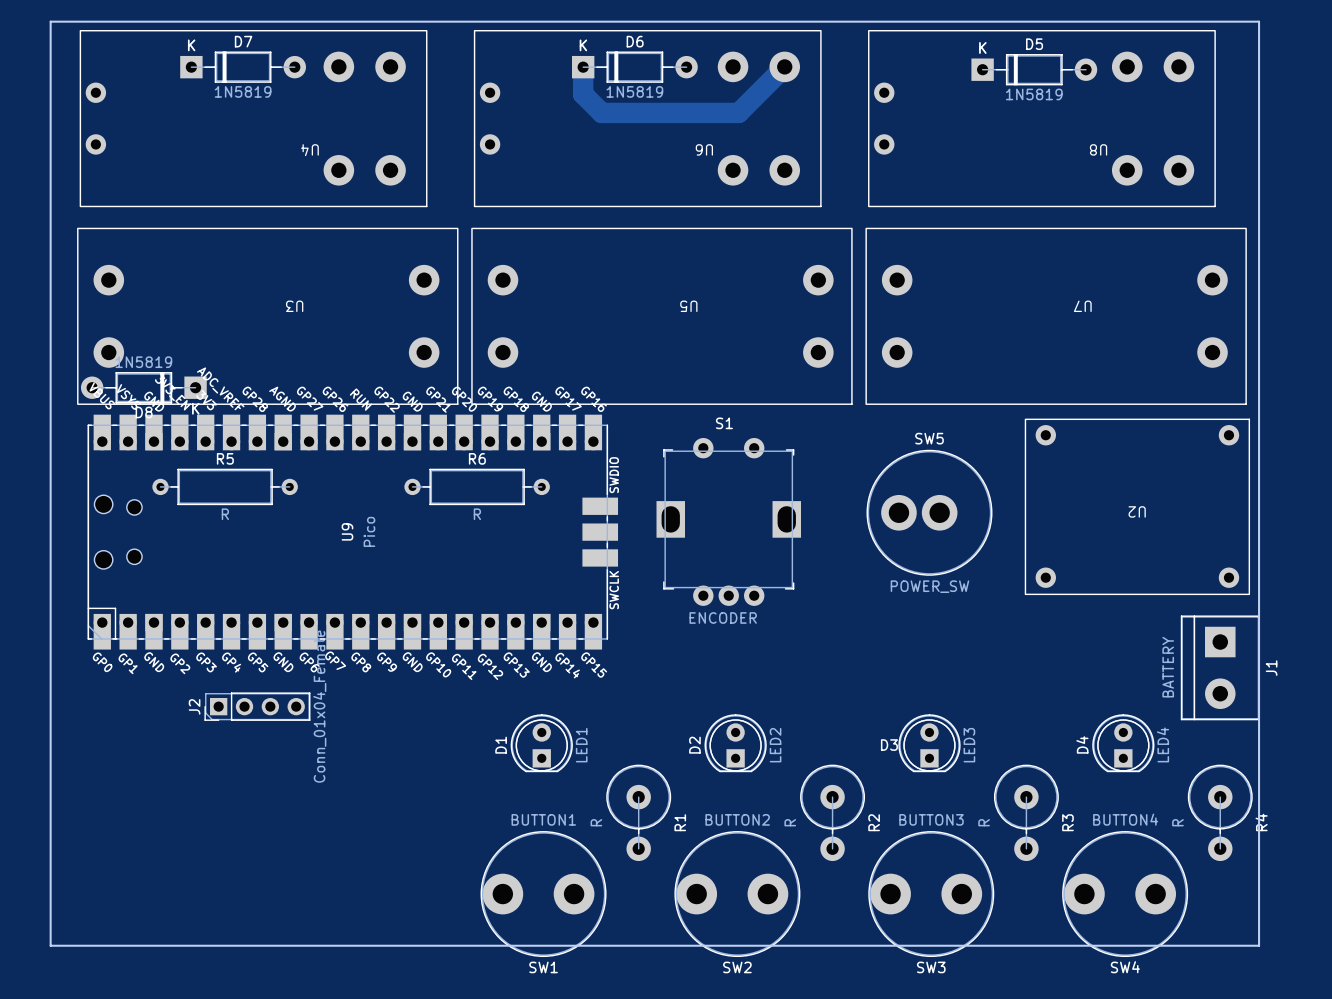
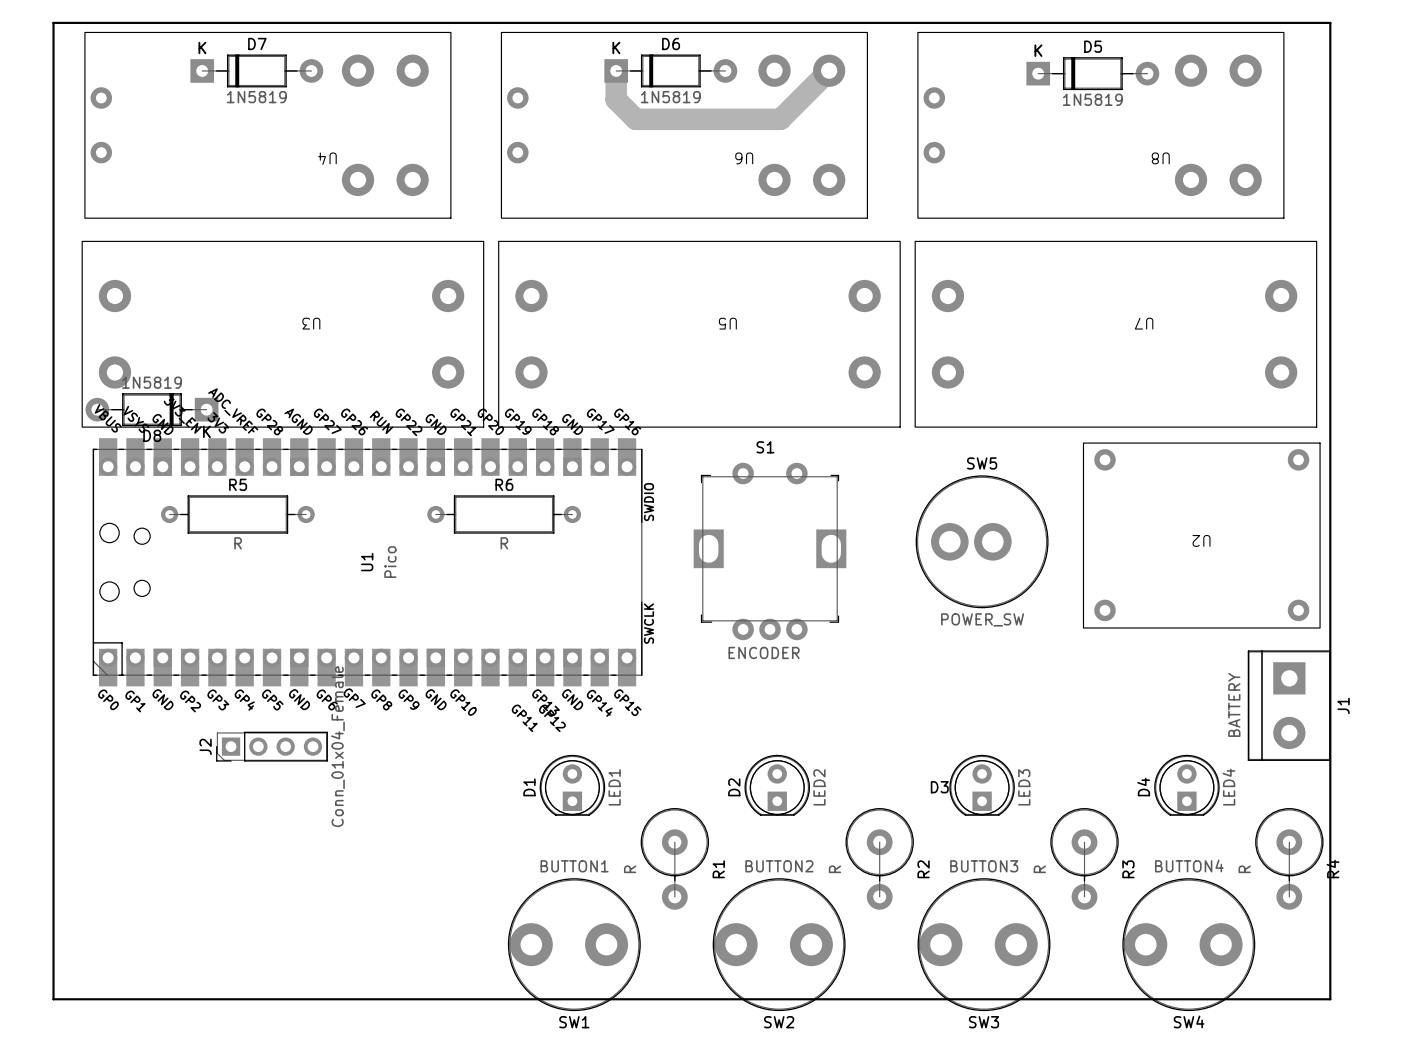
U1: none -> Pico (367, 562)
U9: Pico (352, 532) -> none

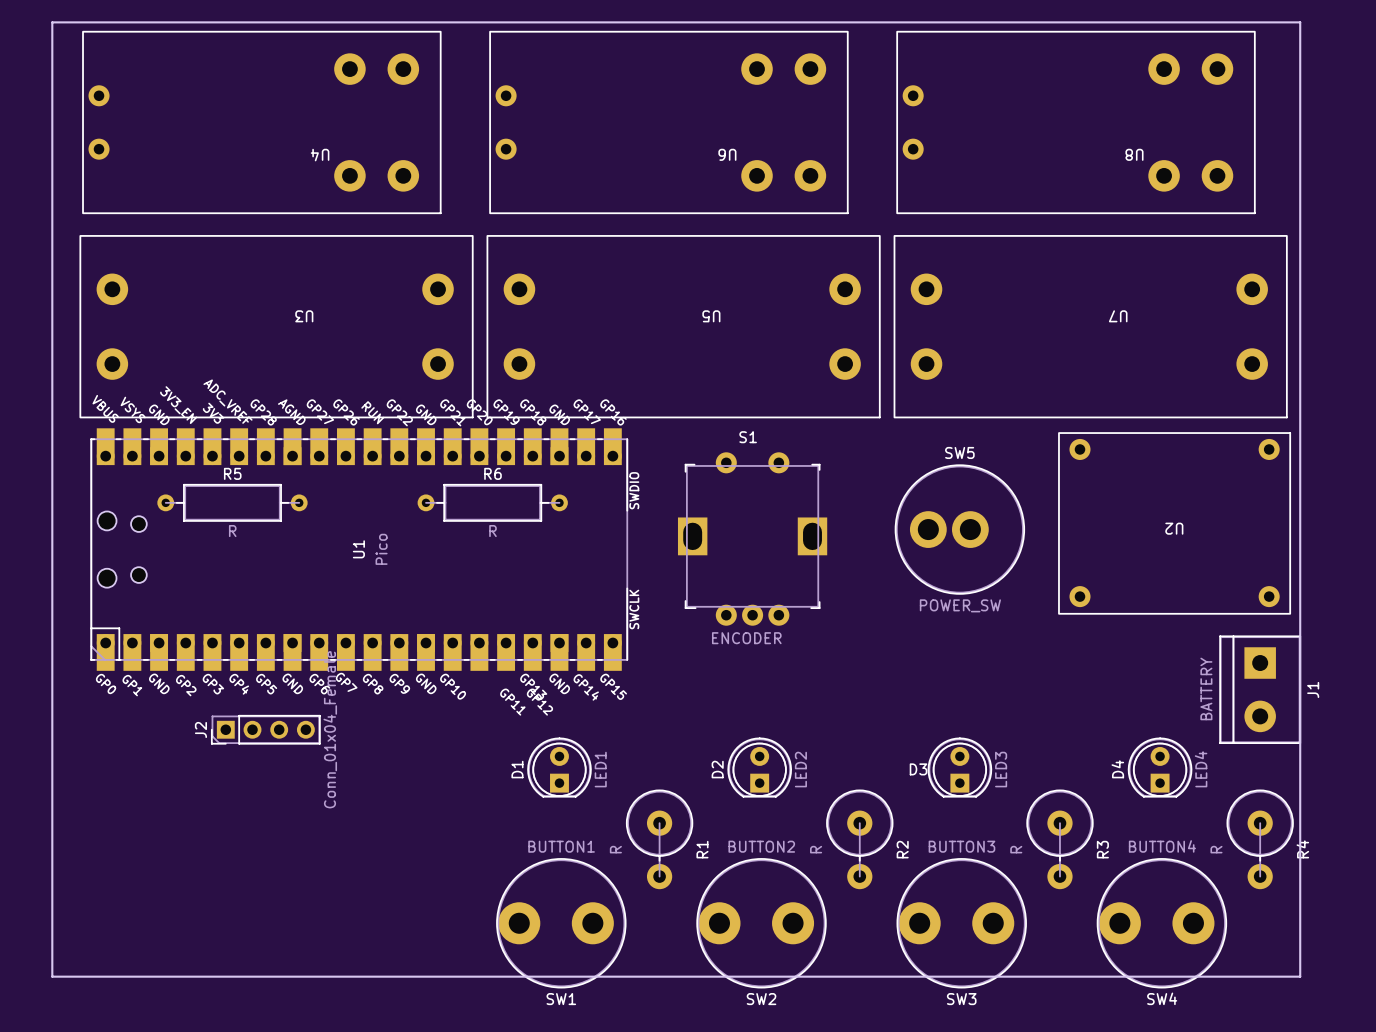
D7: 1N5819 (256, 70) -> none
D6: 1N5819 (670, 70) -> none
track: (829, 70) (780, 119) (635, 119) (616, 99) (616, 70) -> none
D5: 1N5819 (1092, 73) -> none
D8: 1N5819 (152, 409) -> none

